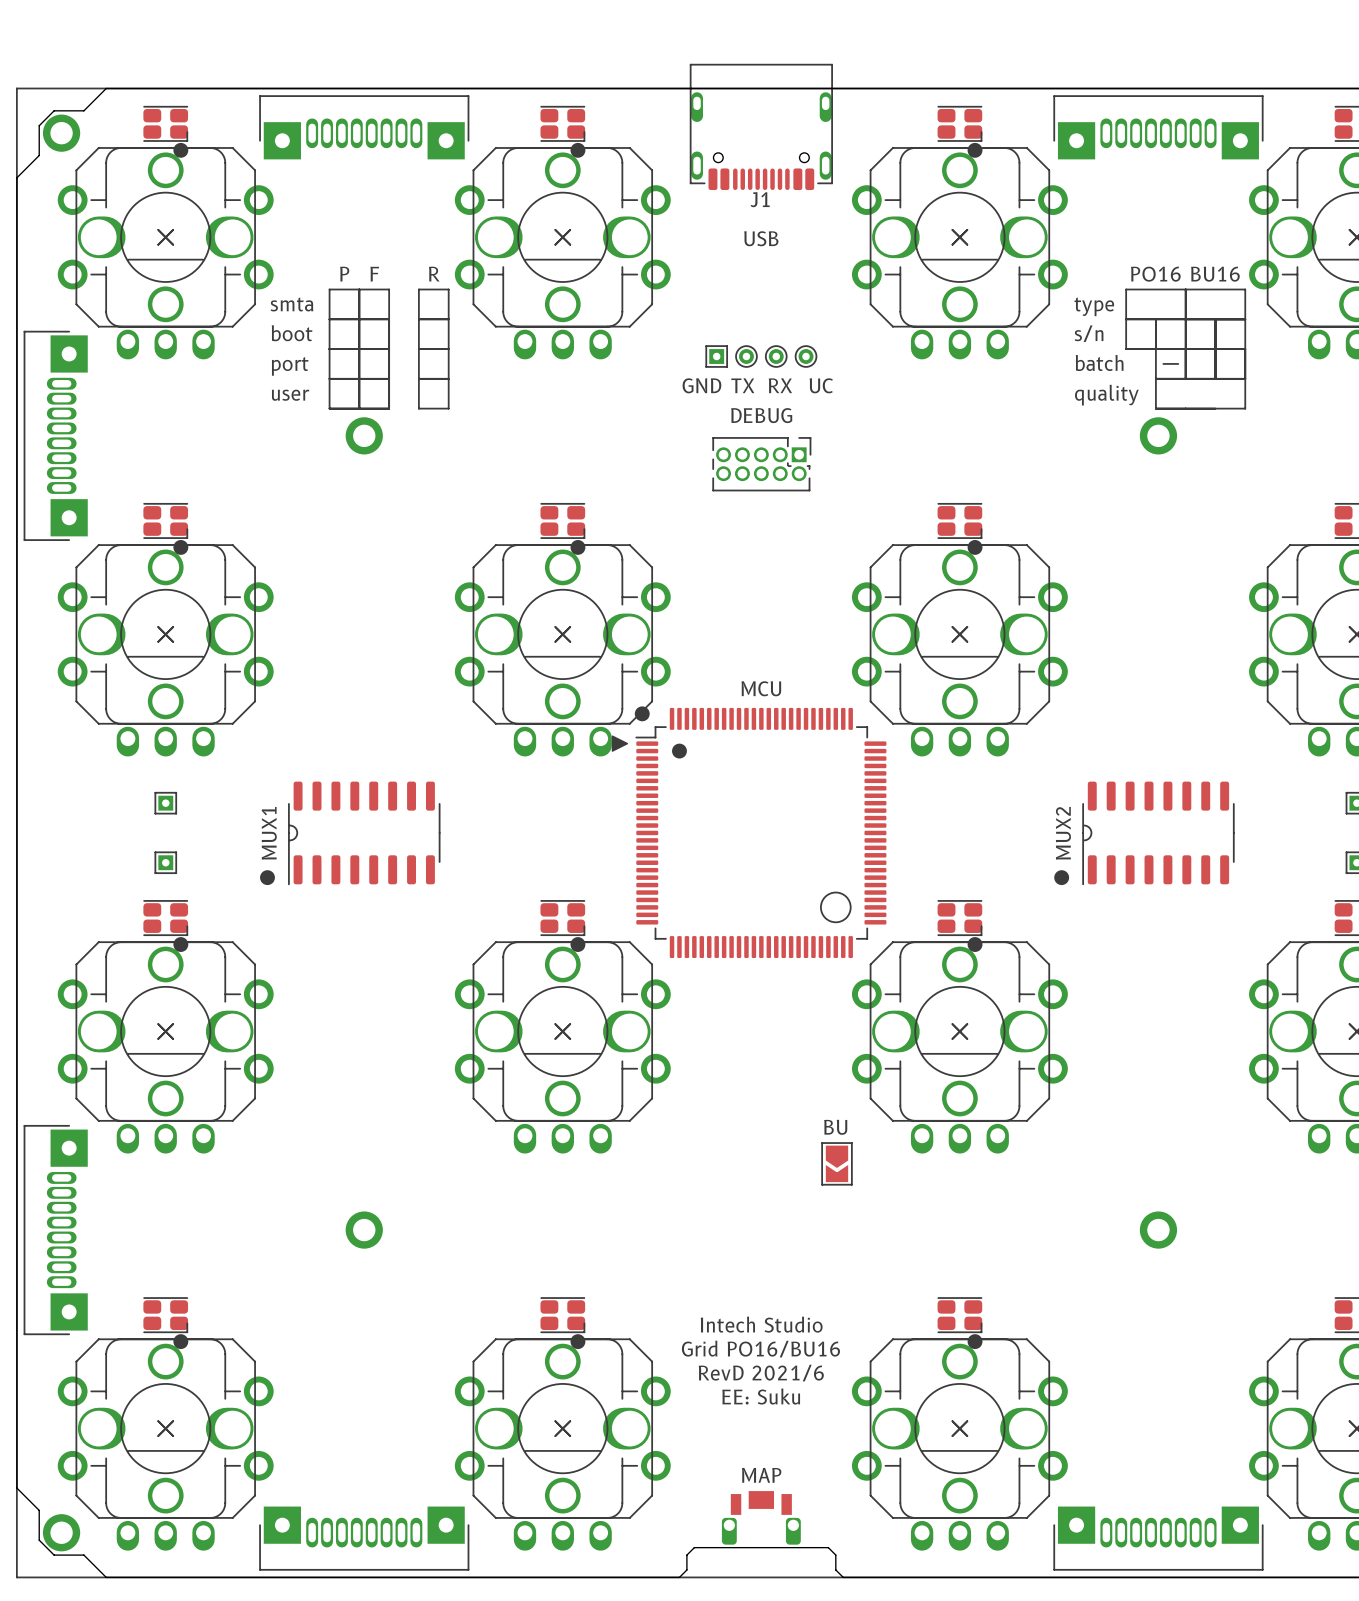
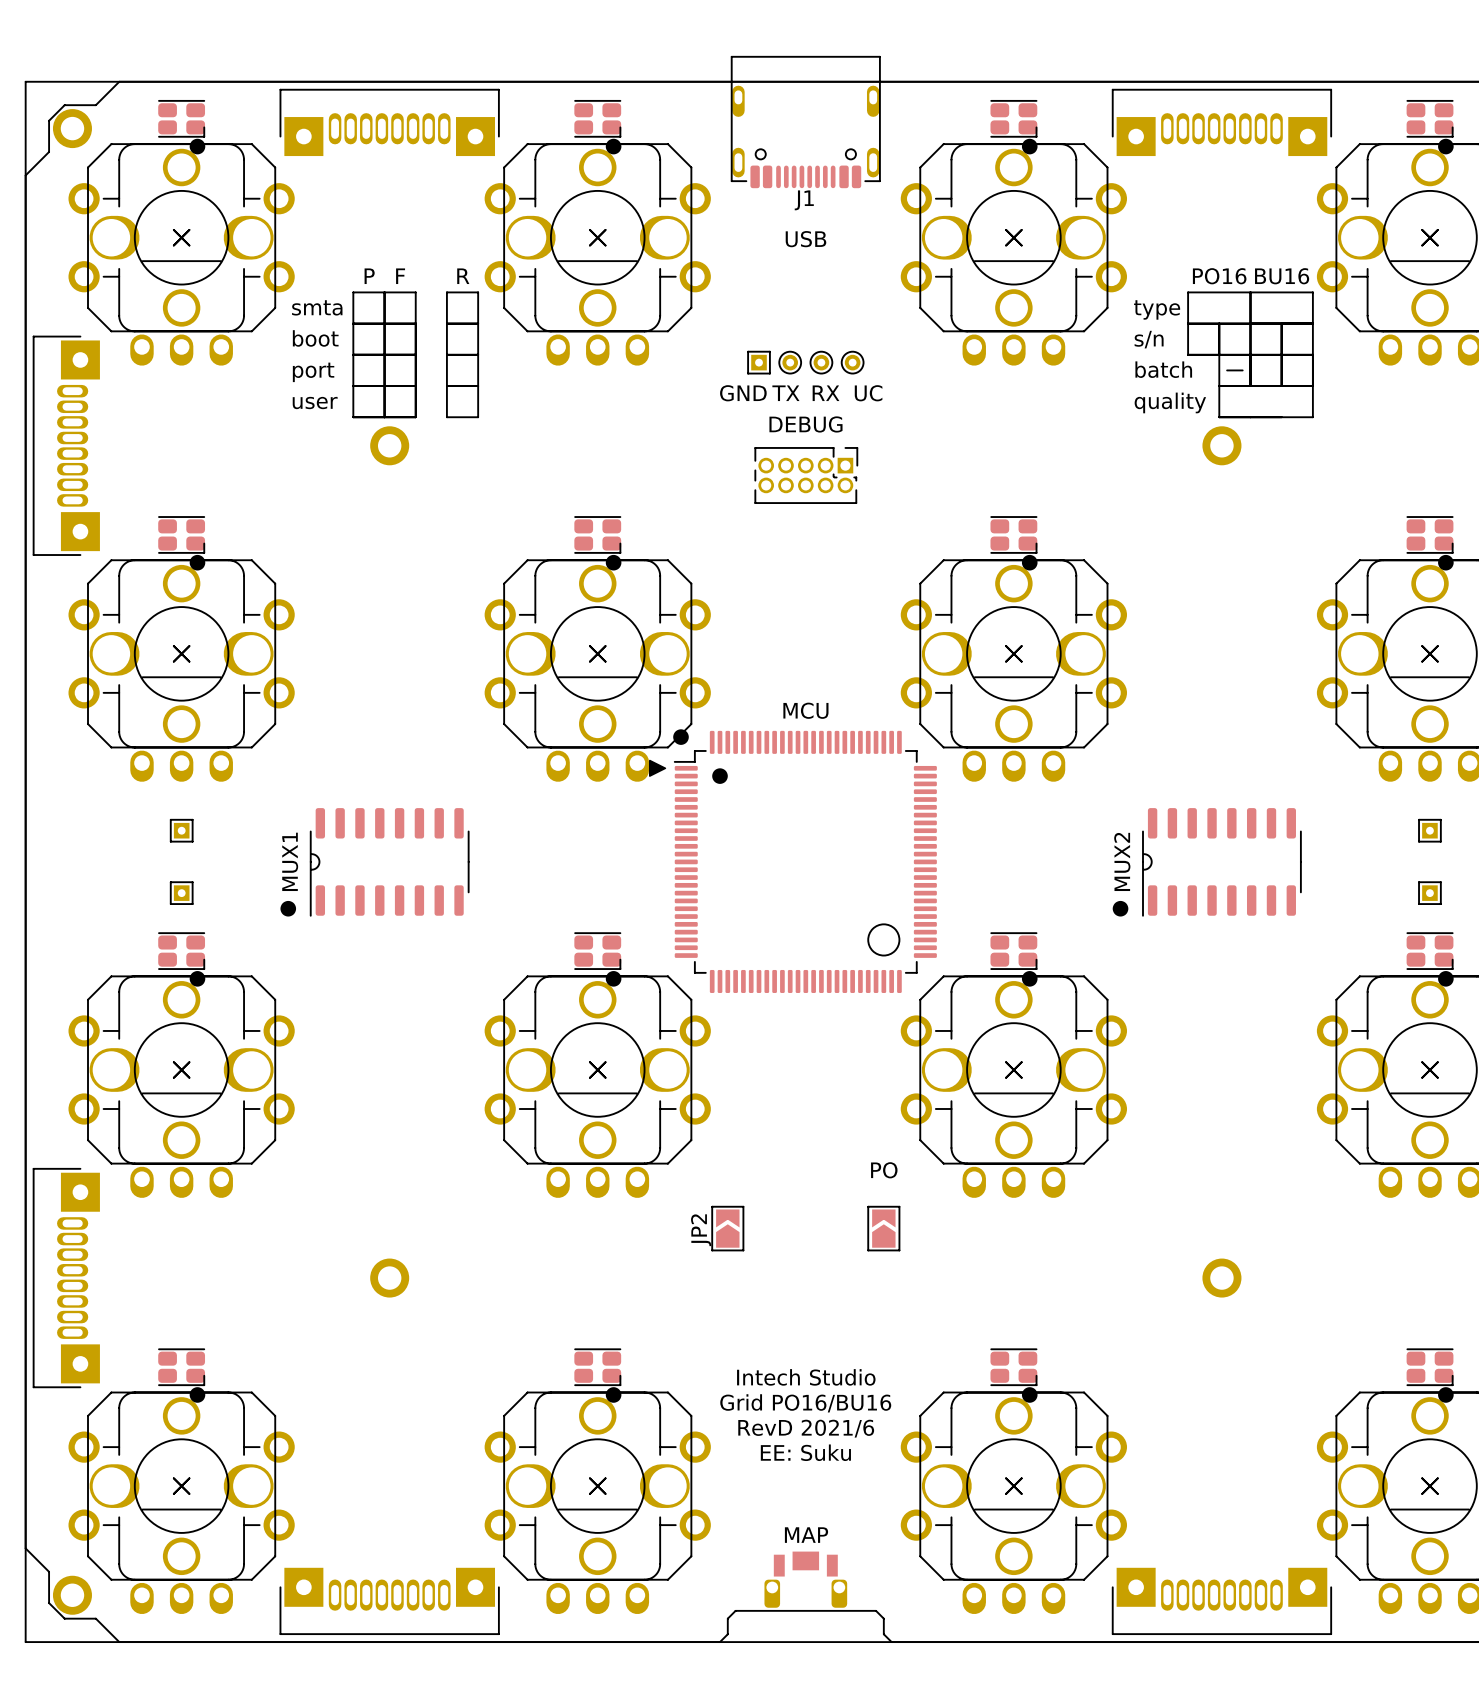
text: BU (835, 1127) -> PO (884, 1170)
part rotation: 0° (836, 1163) -> 180° (883, 1228)
JP2: none -> (727, 1228)

